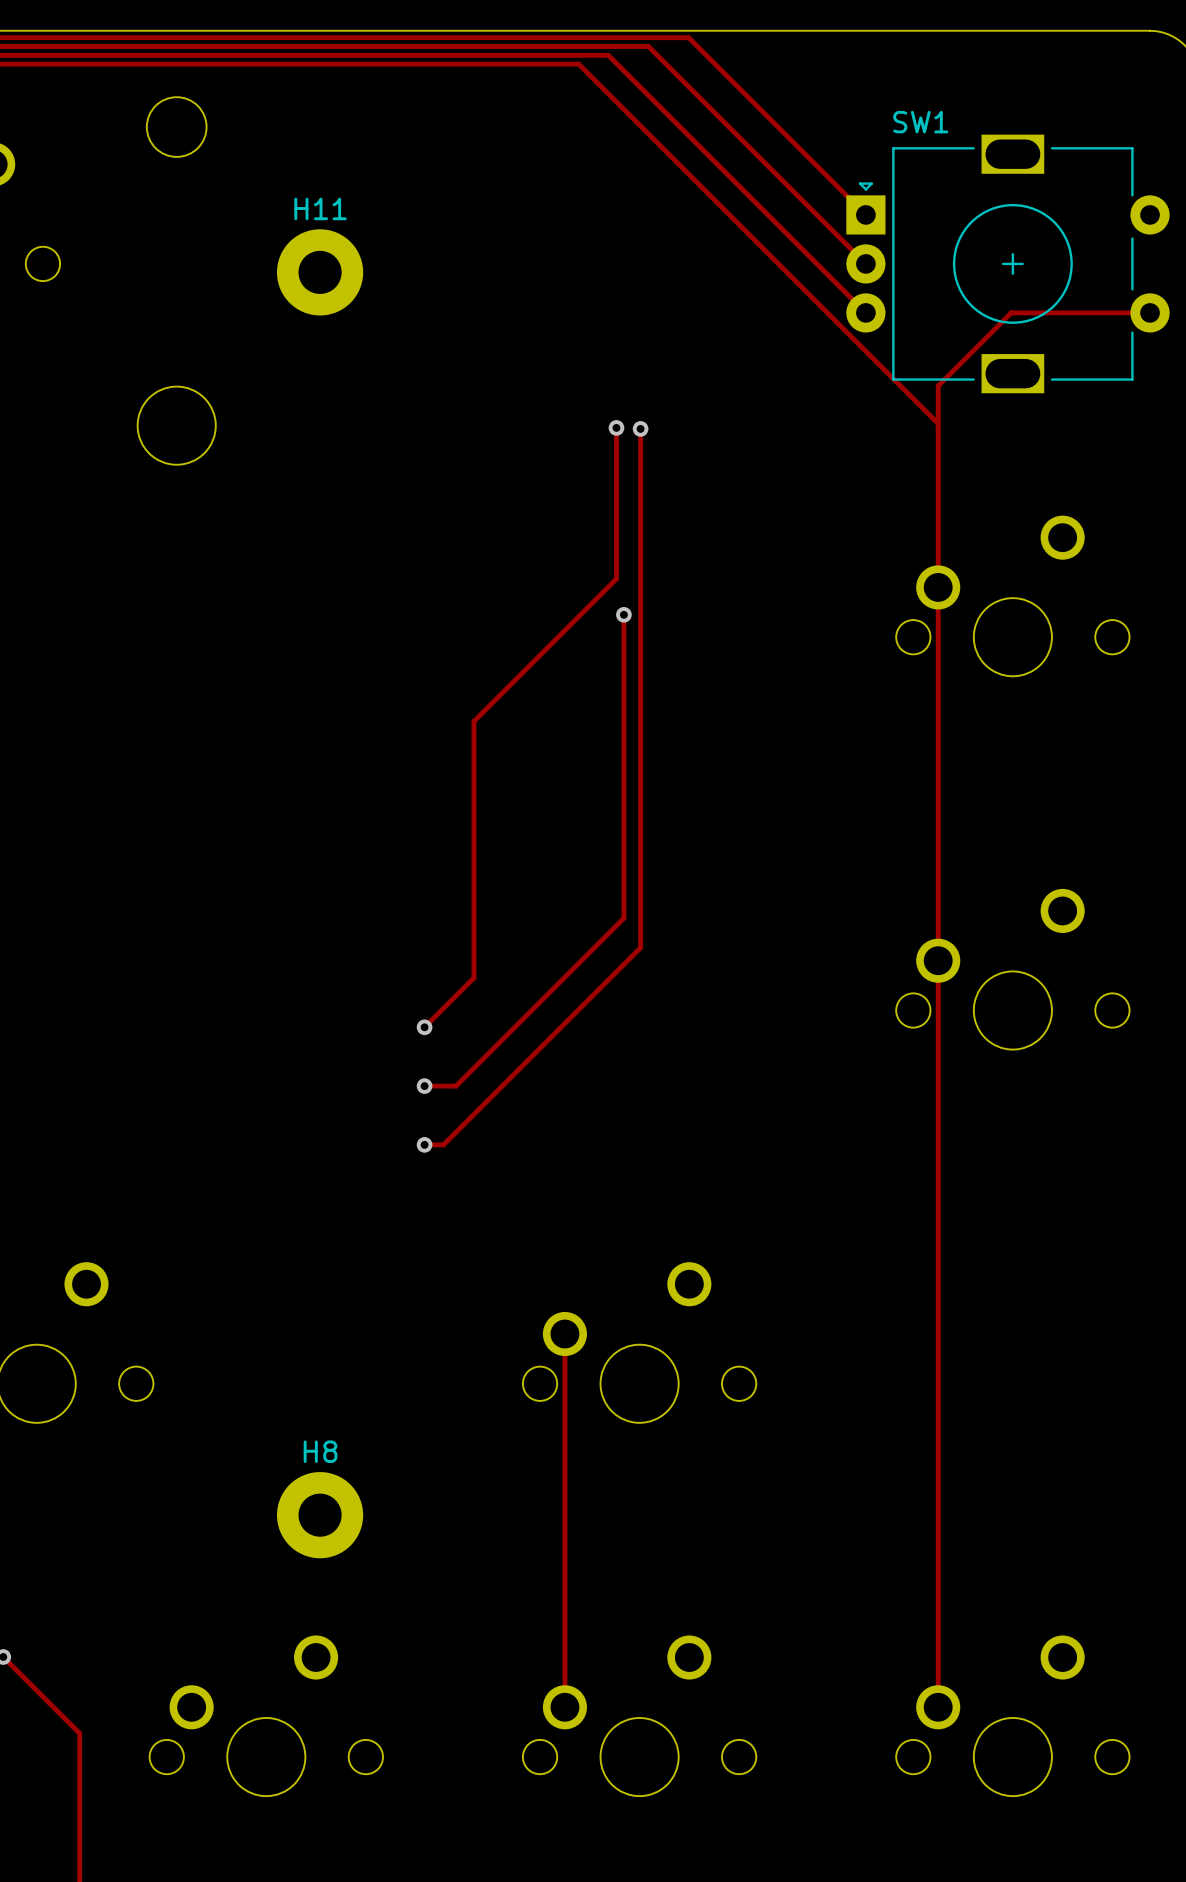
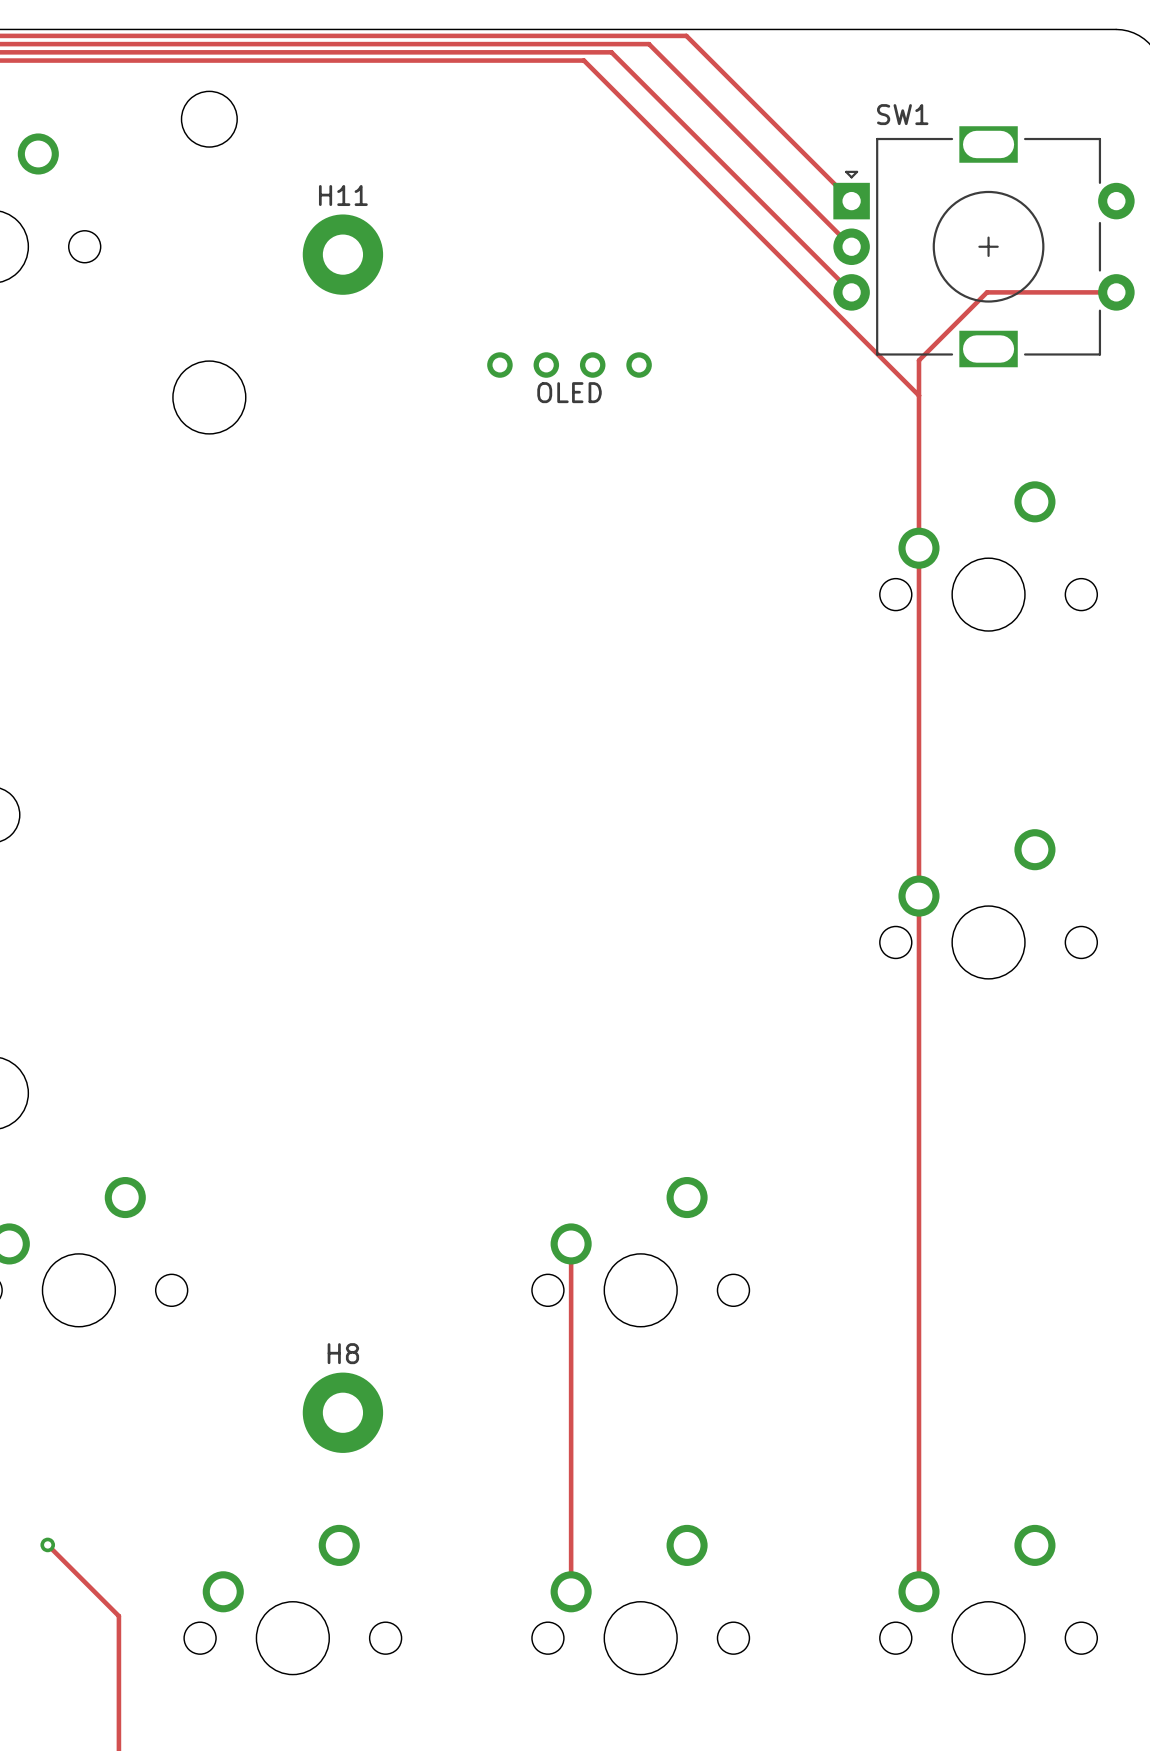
part: none -> (569, 365)
track: (616, 427) (616, 578) (473, 721) (473, 977) (424, 1027) -> none
via: (616, 427) -> none
track: (640, 428) (640, 947) (443, 1144) (424, 1144) -> none
via: (640, 428) -> none
track: (623, 614) (623, 918) (455, 1086) (424, 1086) -> none
via: (623, 614) -> none
via: (424, 1027) -> none
via: (424, 1086) -> none
via: (424, 1144) -> none

